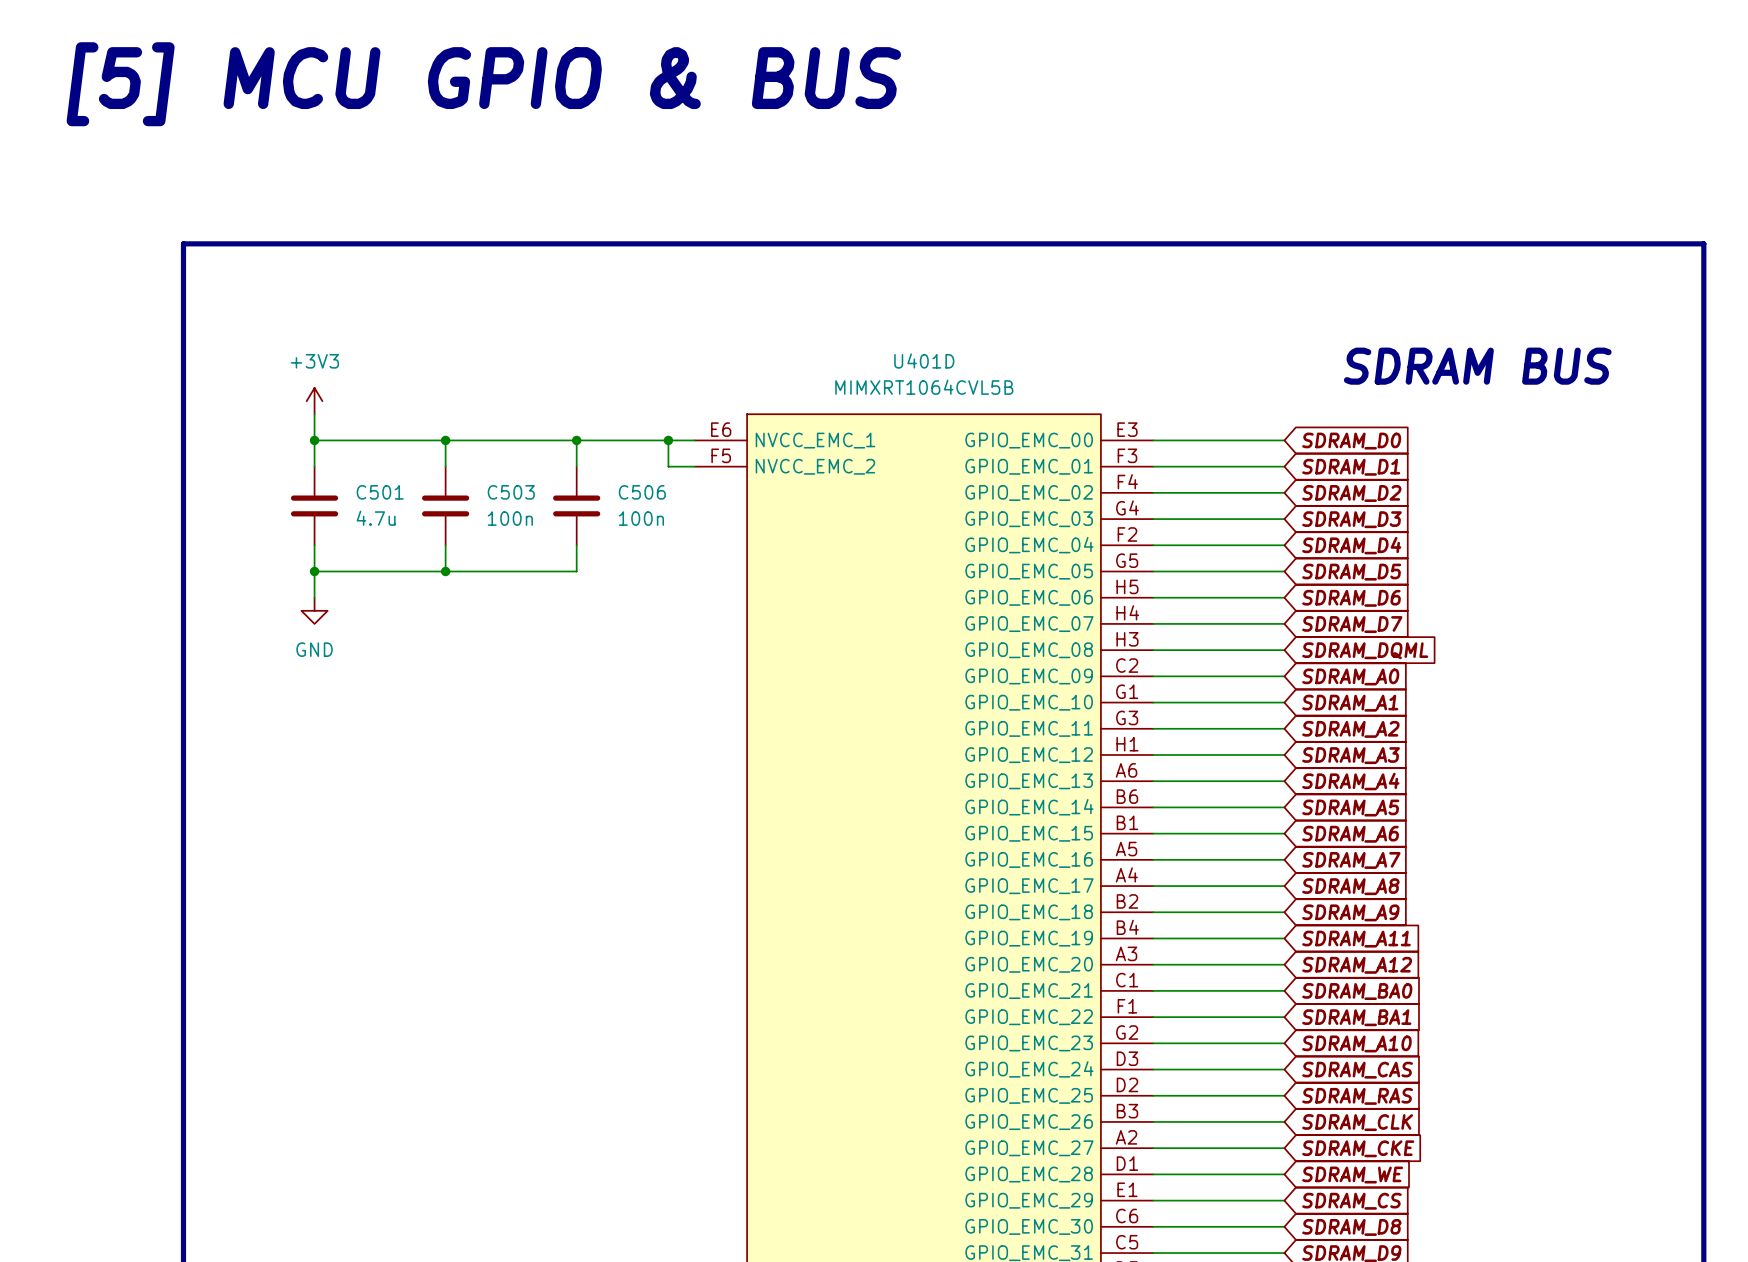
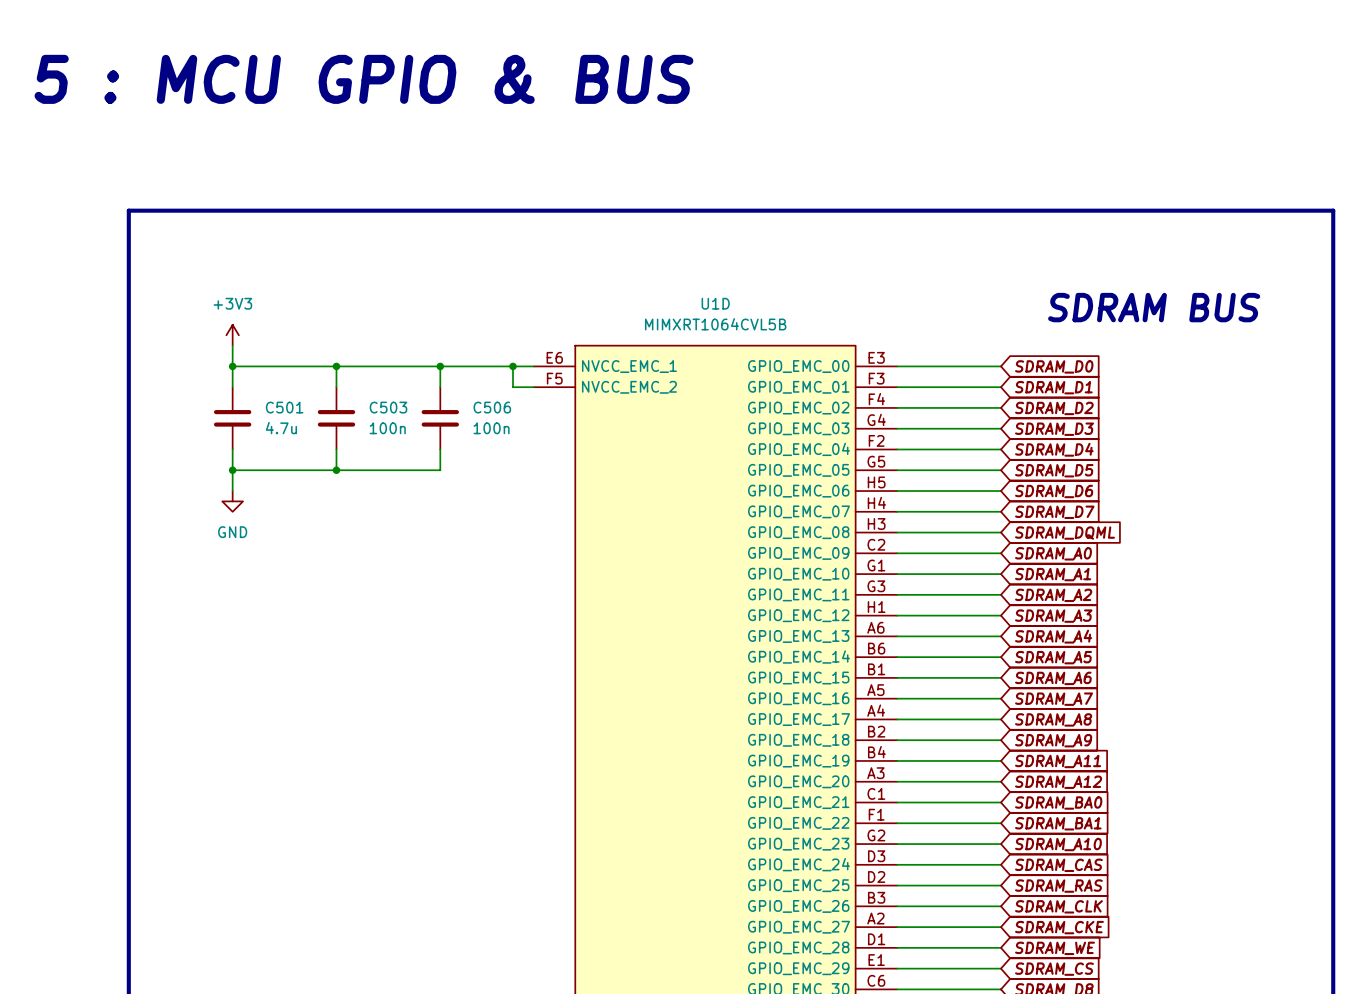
text: [5] MCU GPIO & BUS (483, 84) -> 5 : MCU GPIO & BUS (363, 79)
U401D name: U401D (924, 361) -> U1D (715, 303)

